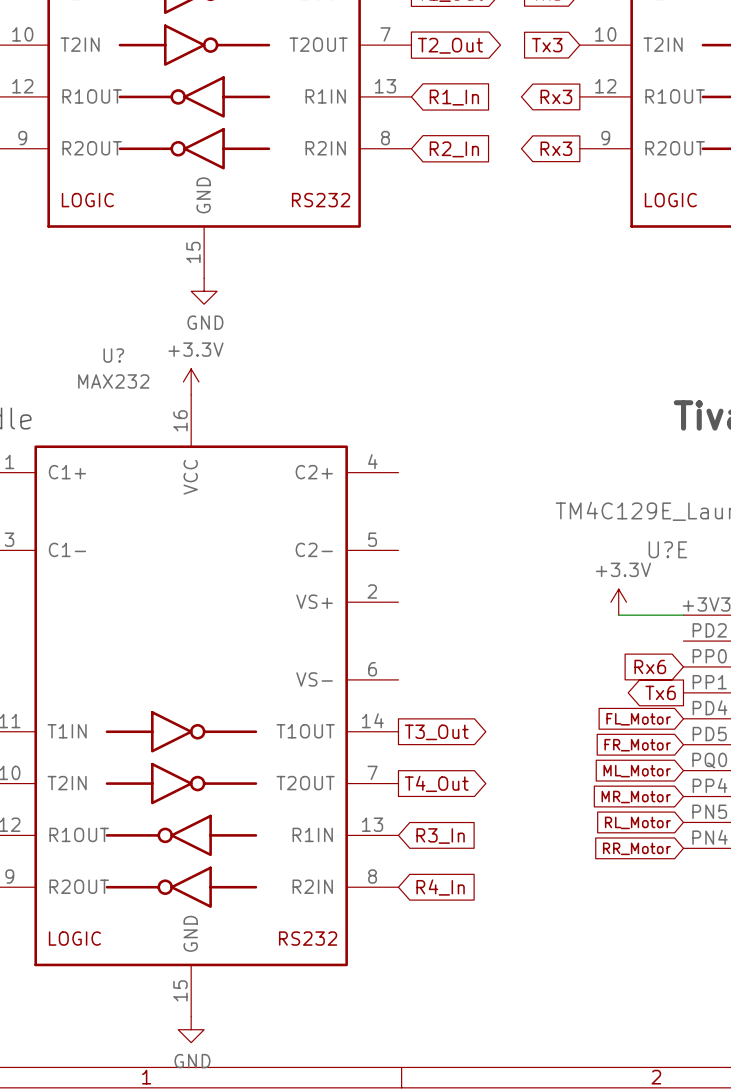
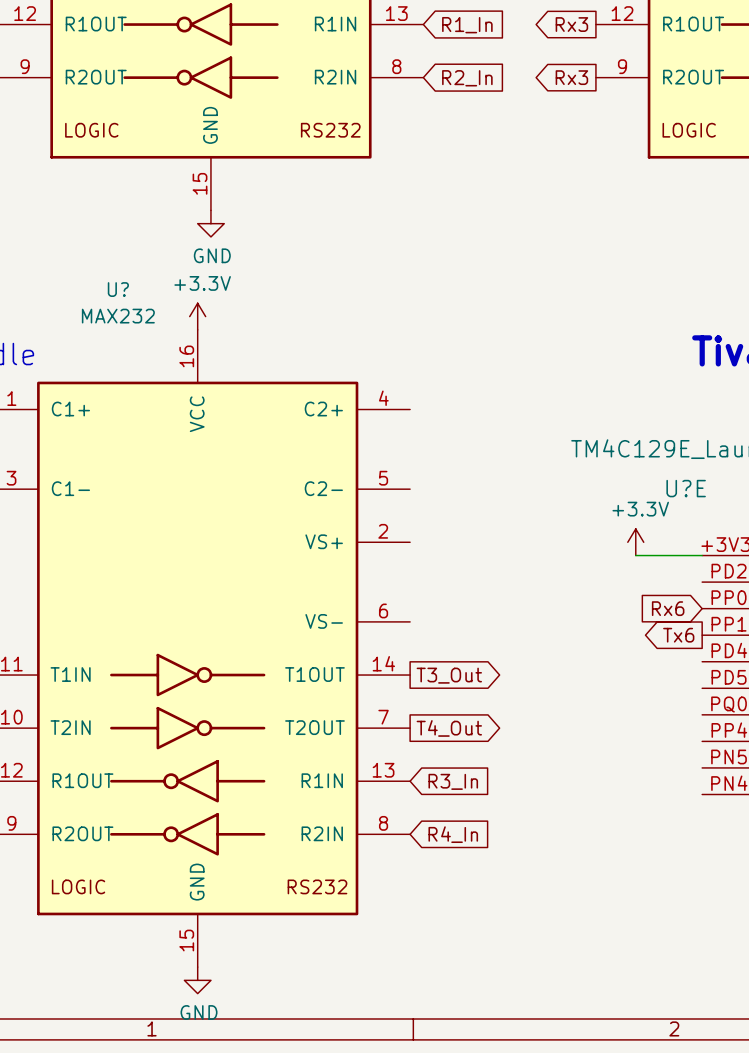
global label: FL_Motor (638, 719) -> none
global label: FR_Motor (637, 745) -> none
global label: ML_Motor (637, 771) -> none
global label: MR_Motor (636, 797) -> none
global label: RL_Motor (637, 822) -> none
global label: RR_Motor (636, 848) -> none

